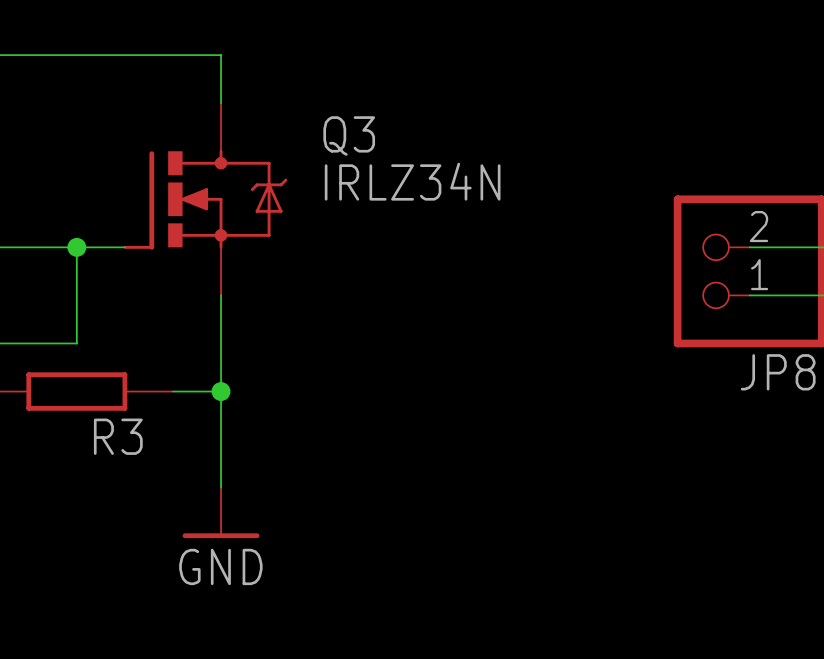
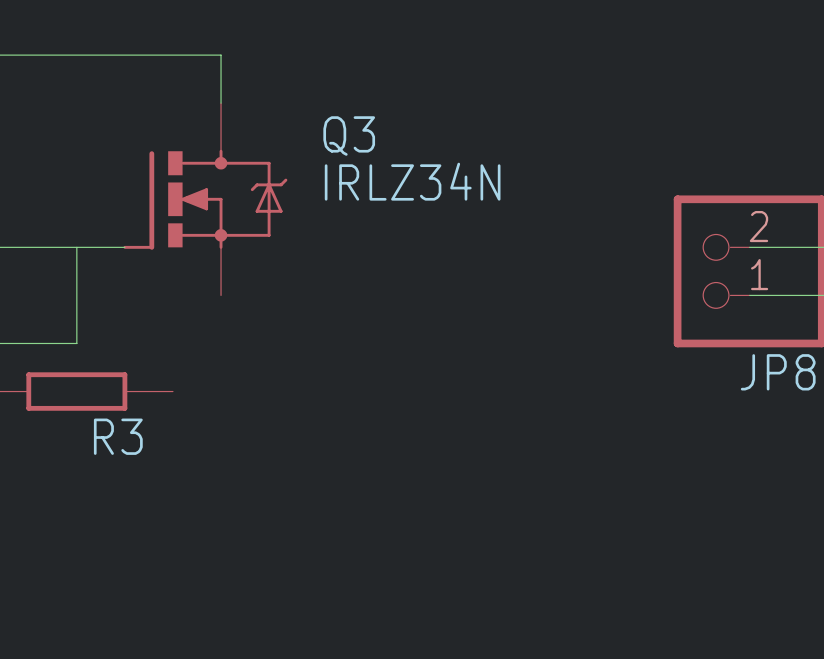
junction: (76, 247) -> none
wire: (221, 295) (221, 487) -> none
wire: (172, 391) (221, 391) -> none
junction: (221, 391) -> none
power symbol: GND (221, 512) -> none

